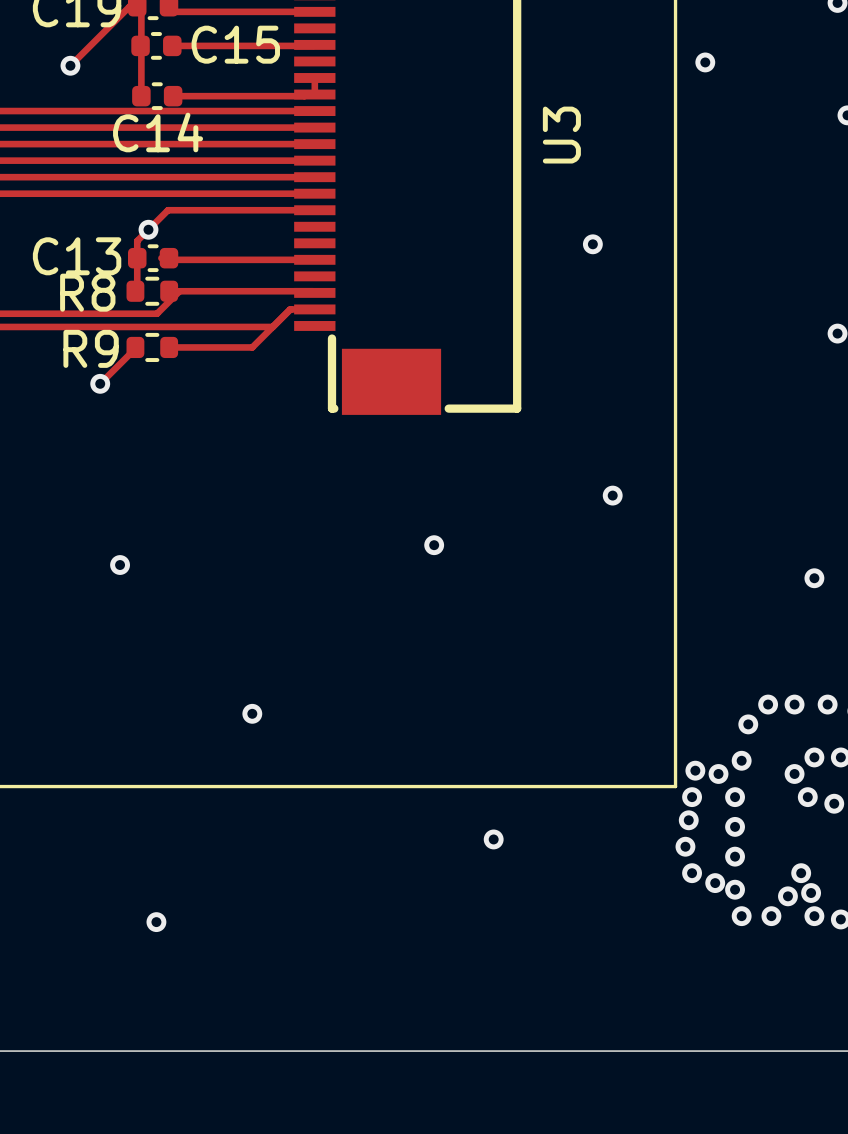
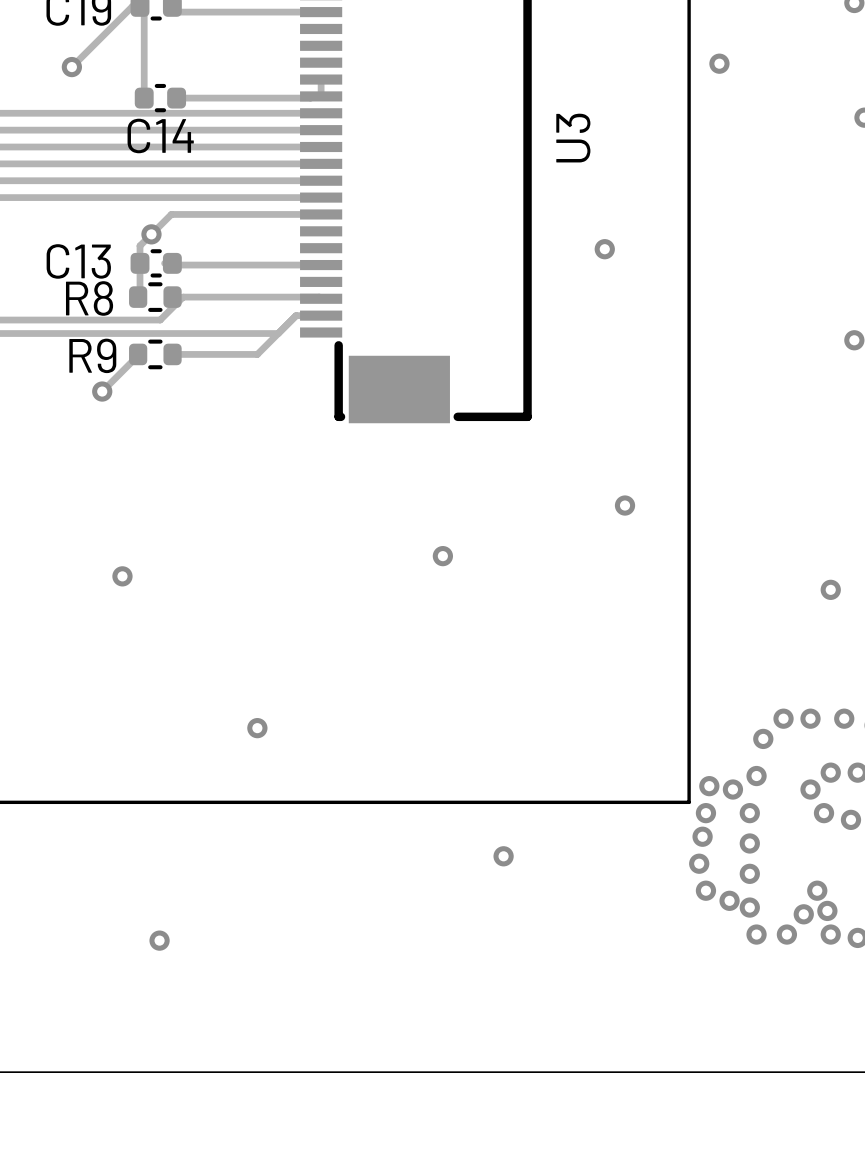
track: (314, 44) (172, 45) -> none
C15: (156, 45) -> none

